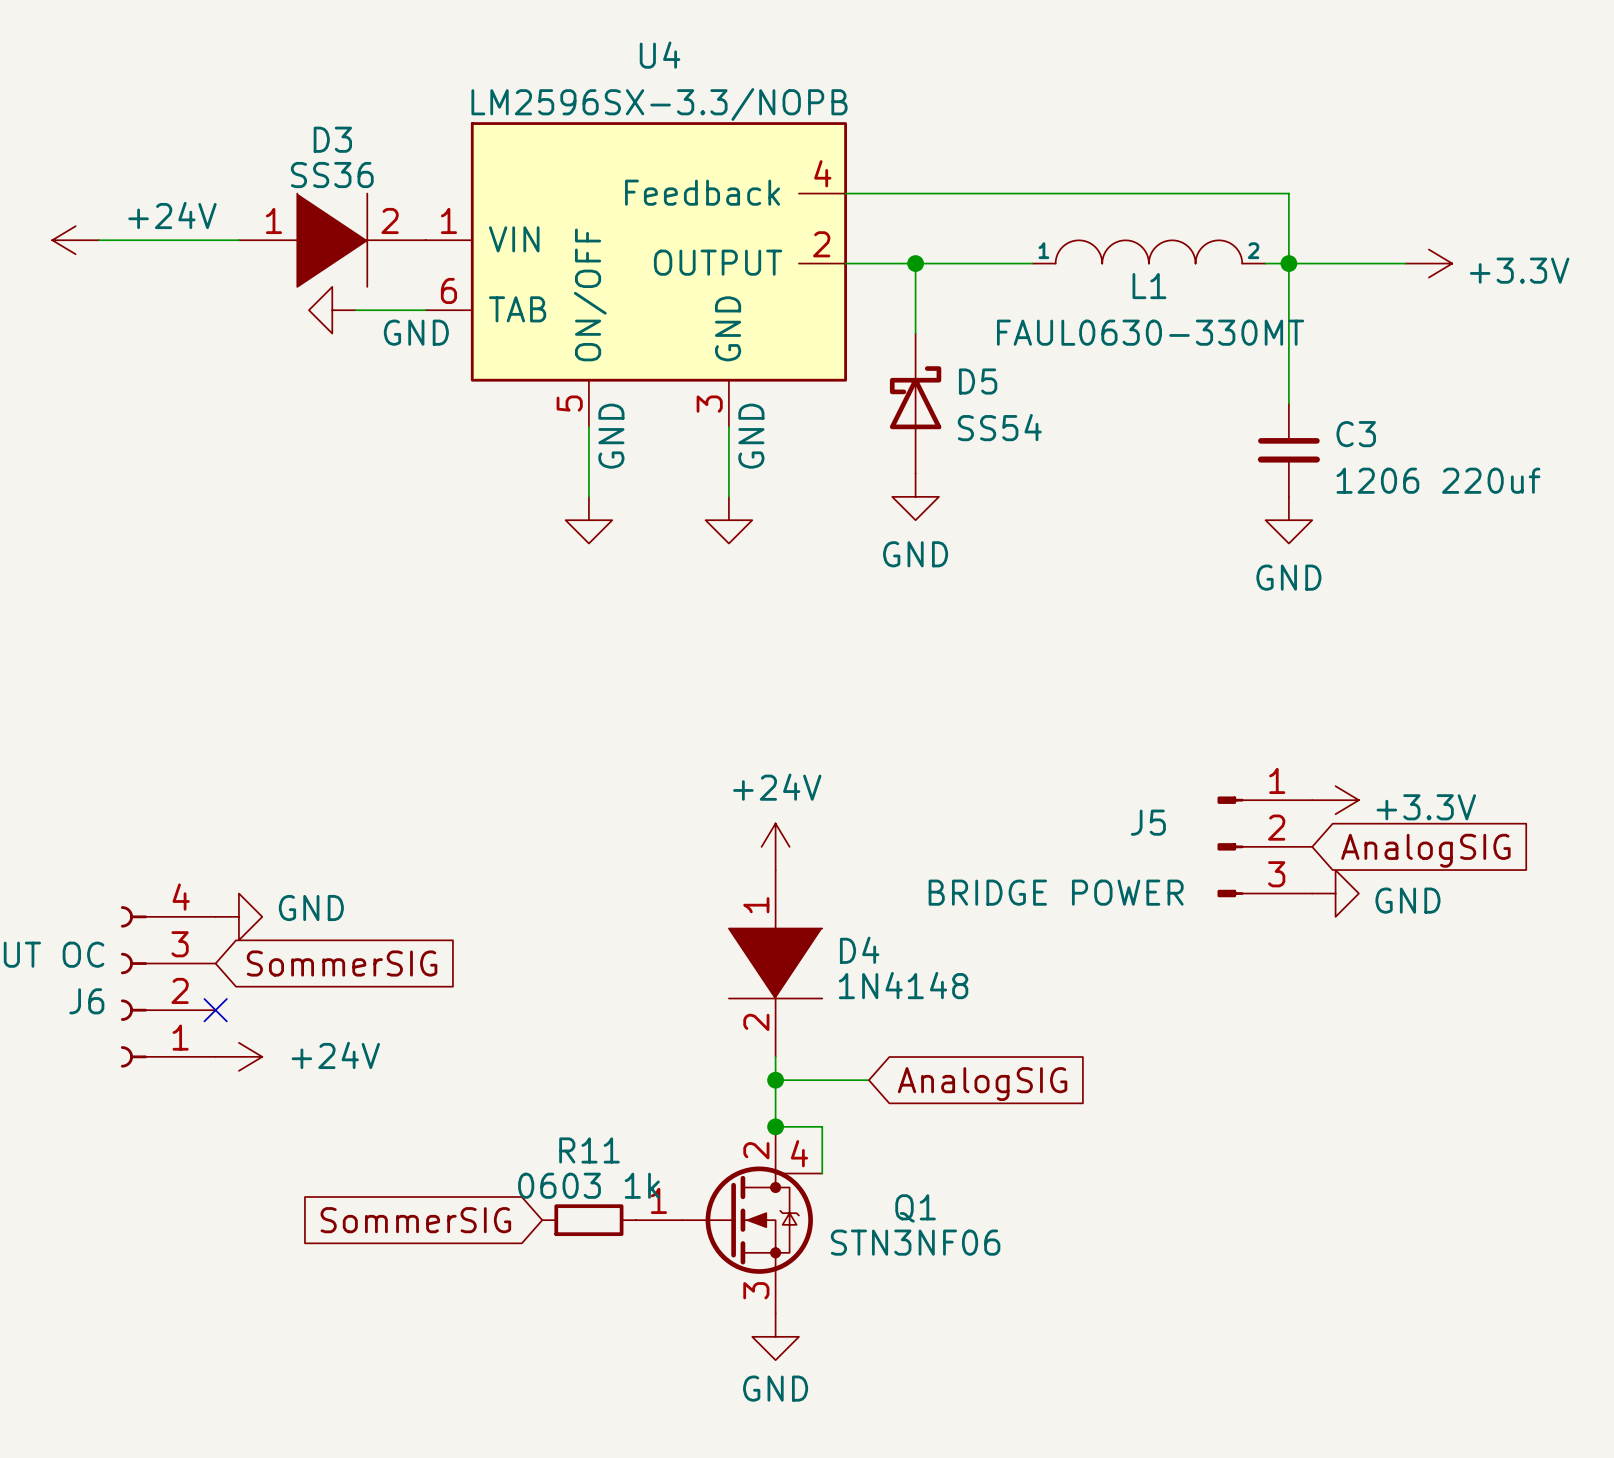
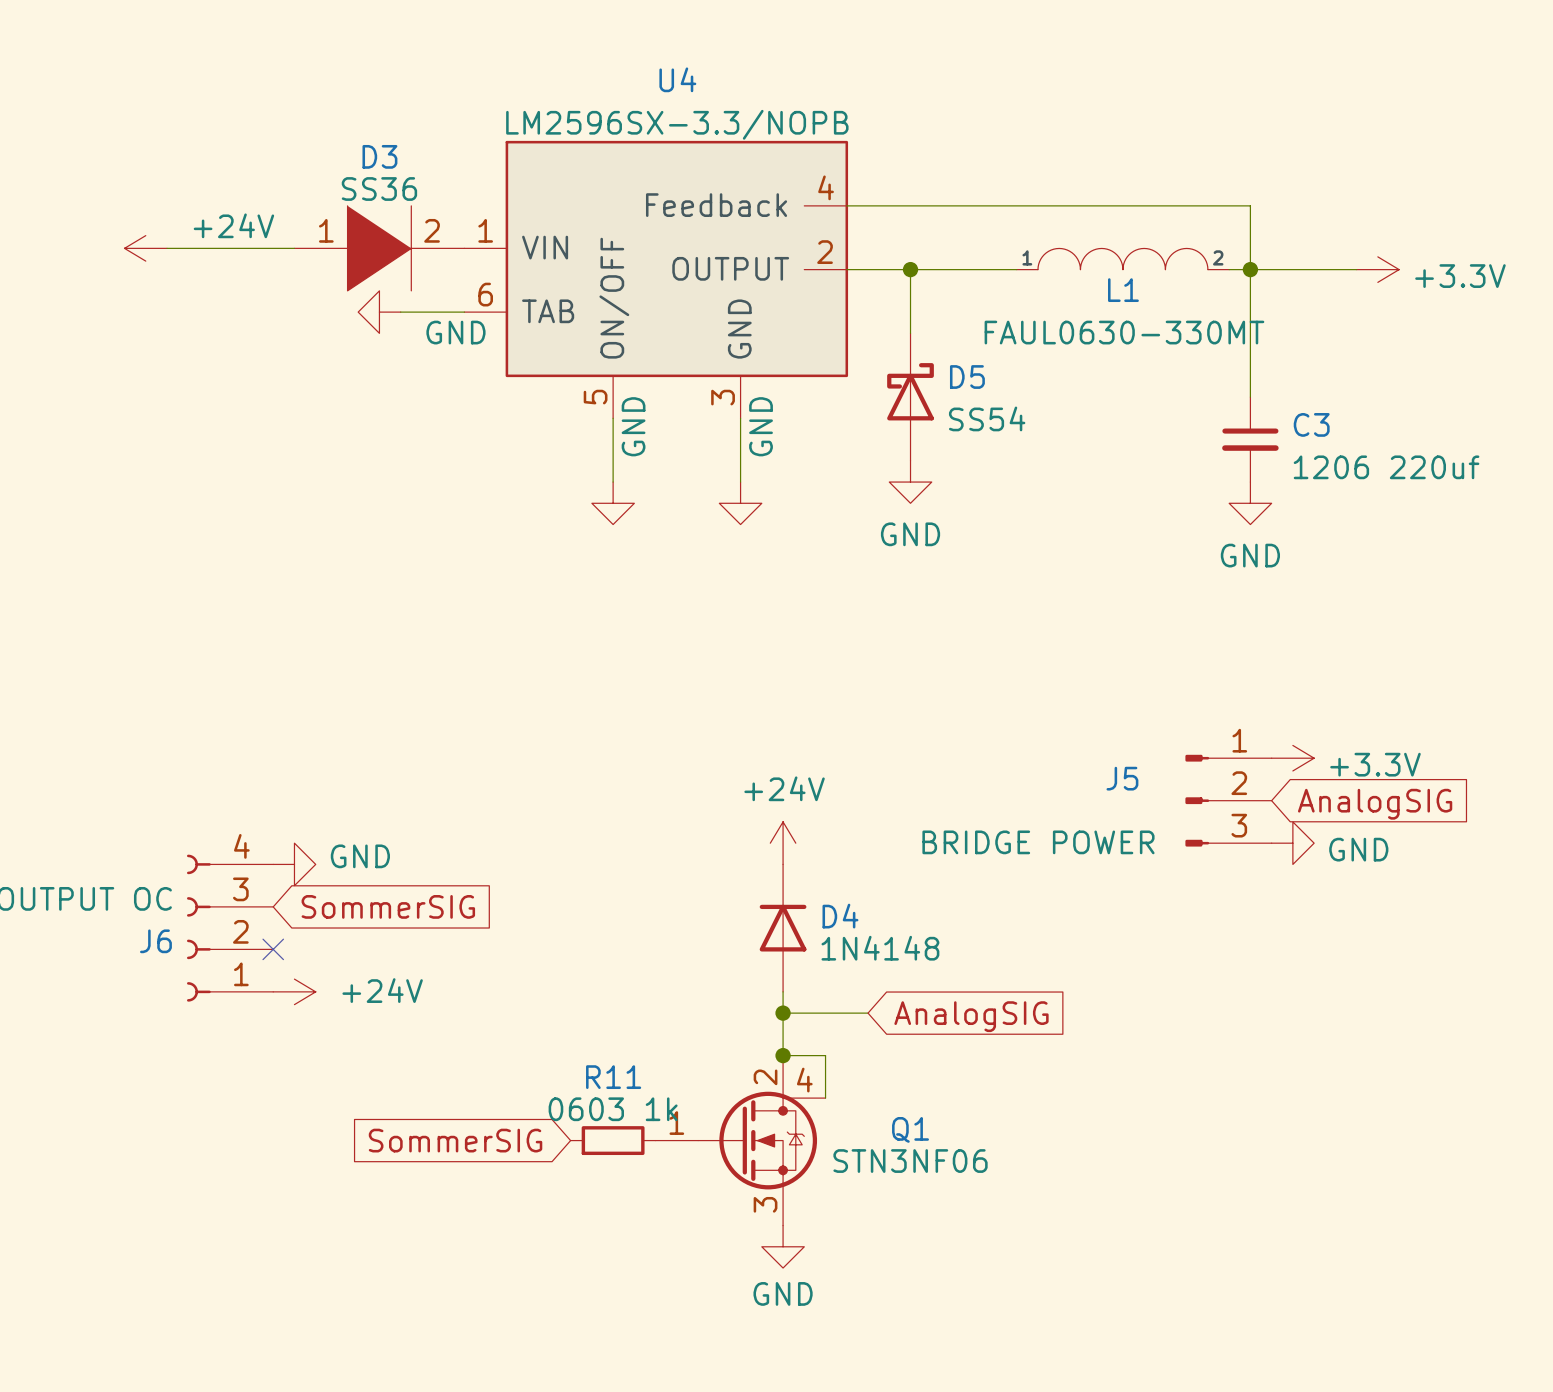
power symbol position: +24V (775, 846) -> +24V (783, 843)
D4 symbol: [728, 870, 823, 1057] -> [759, 864, 807, 992]

